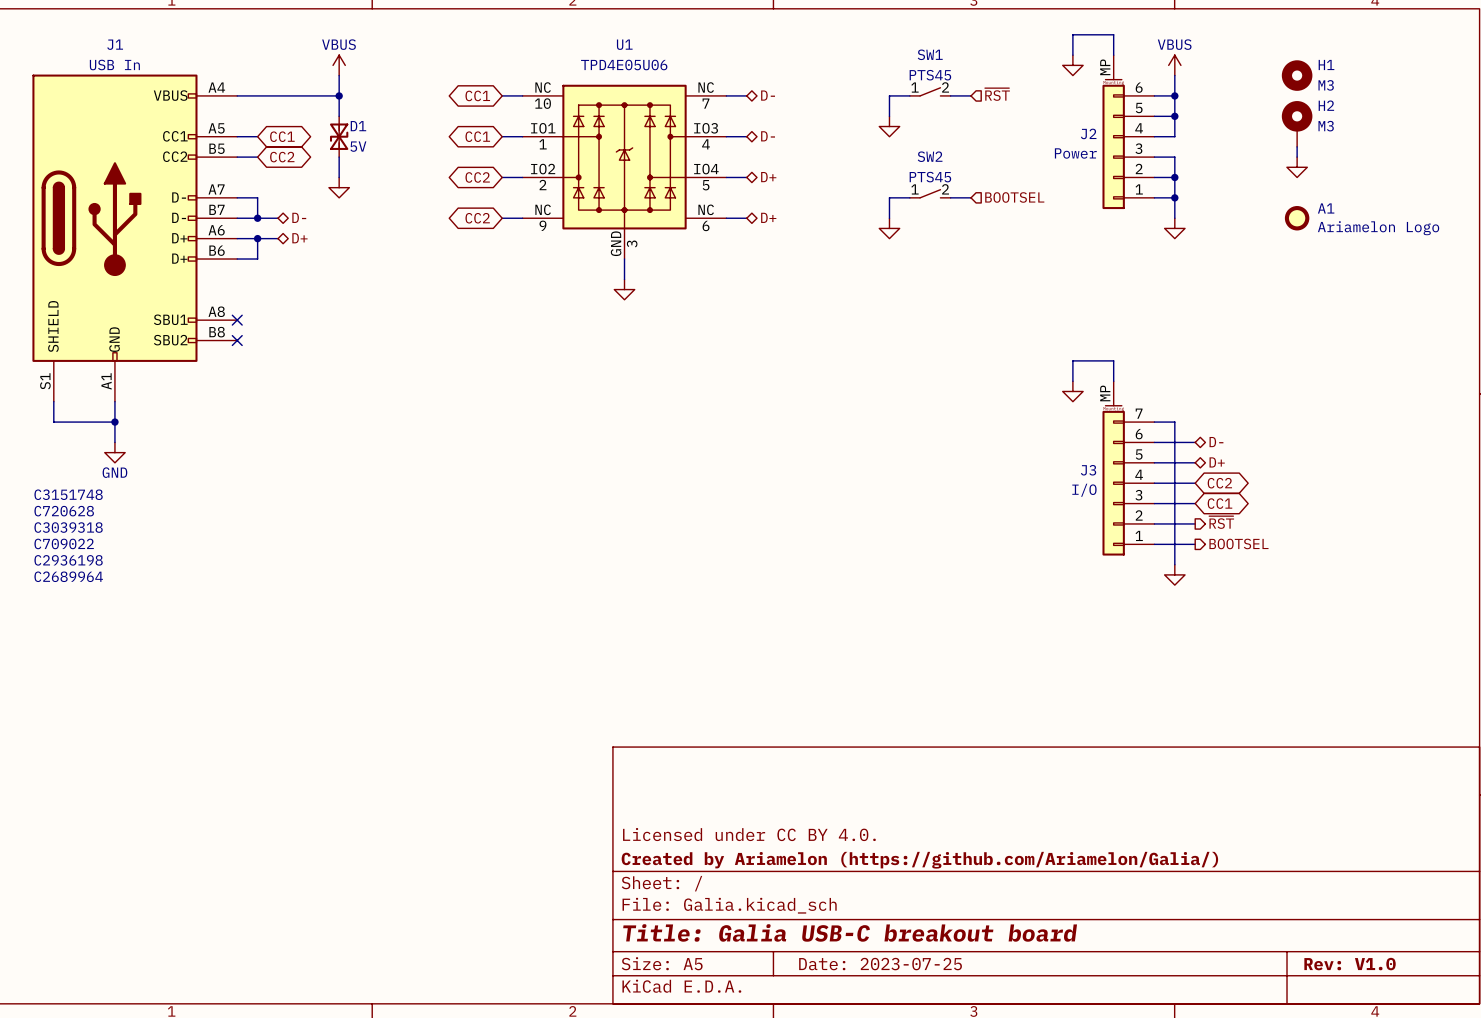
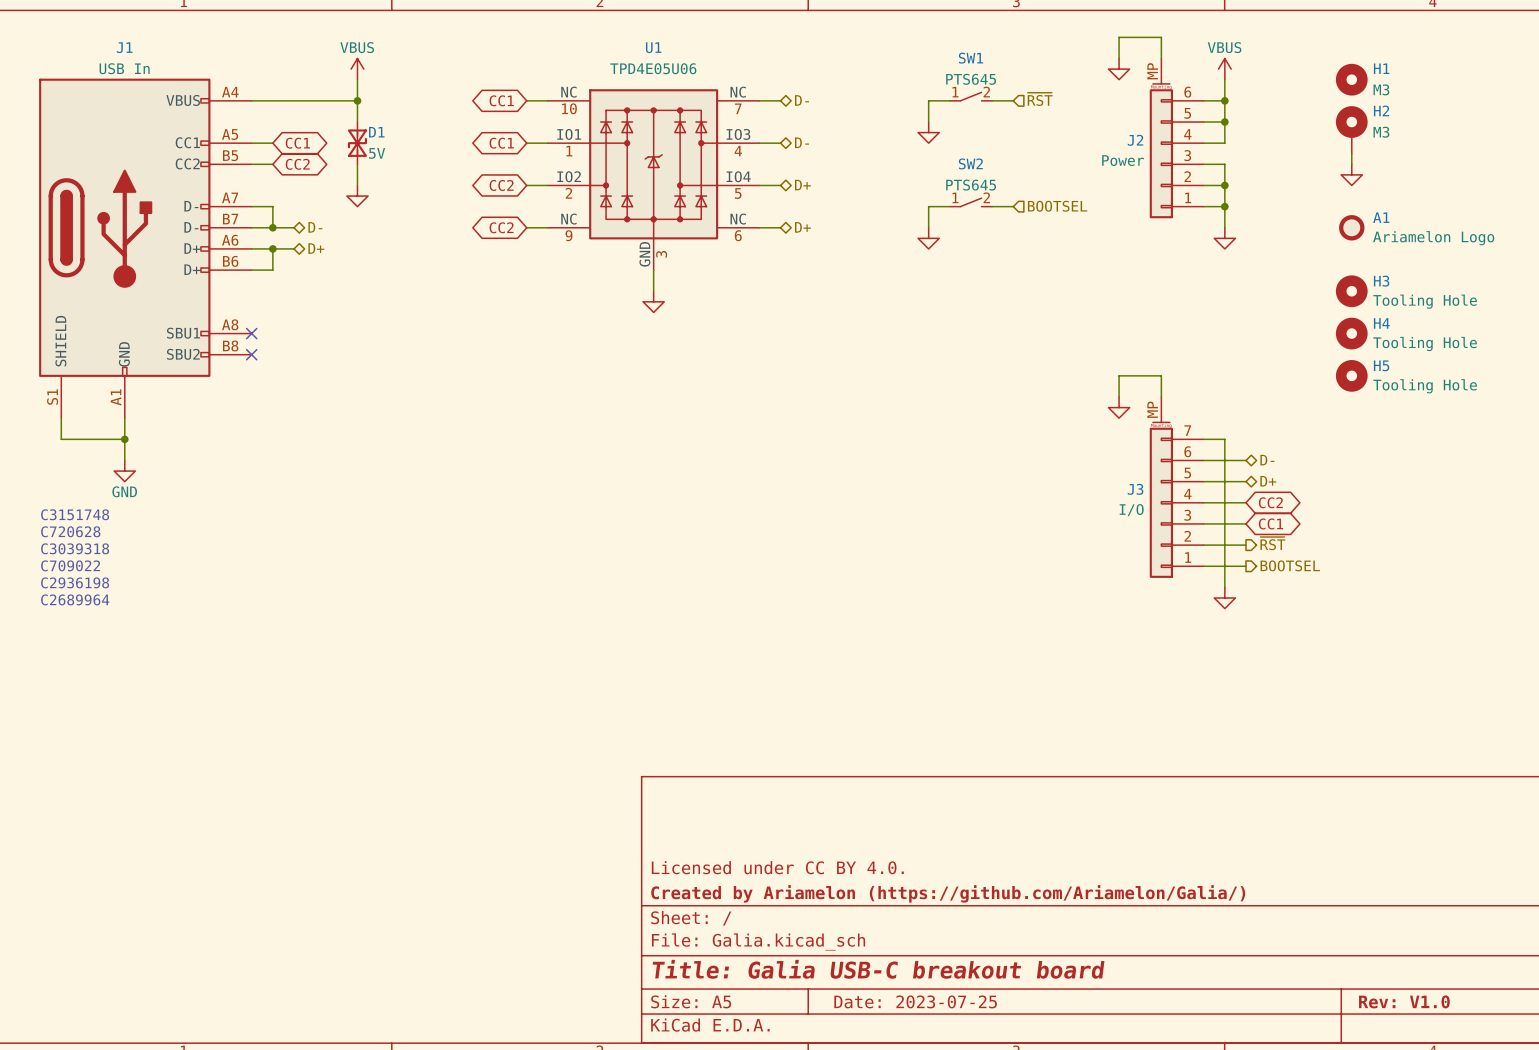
SW1 value: PTS45 (930, 75) -> PTS645 (971, 79)
SW2 value: PTS45 (930, 177) -> PTS645 (971, 185)
H3: none -> Tooling Hole (1351, 291)
H4: none -> Tooling Hole (1351, 333)
H5: none -> Tooling Hole (1351, 375)

